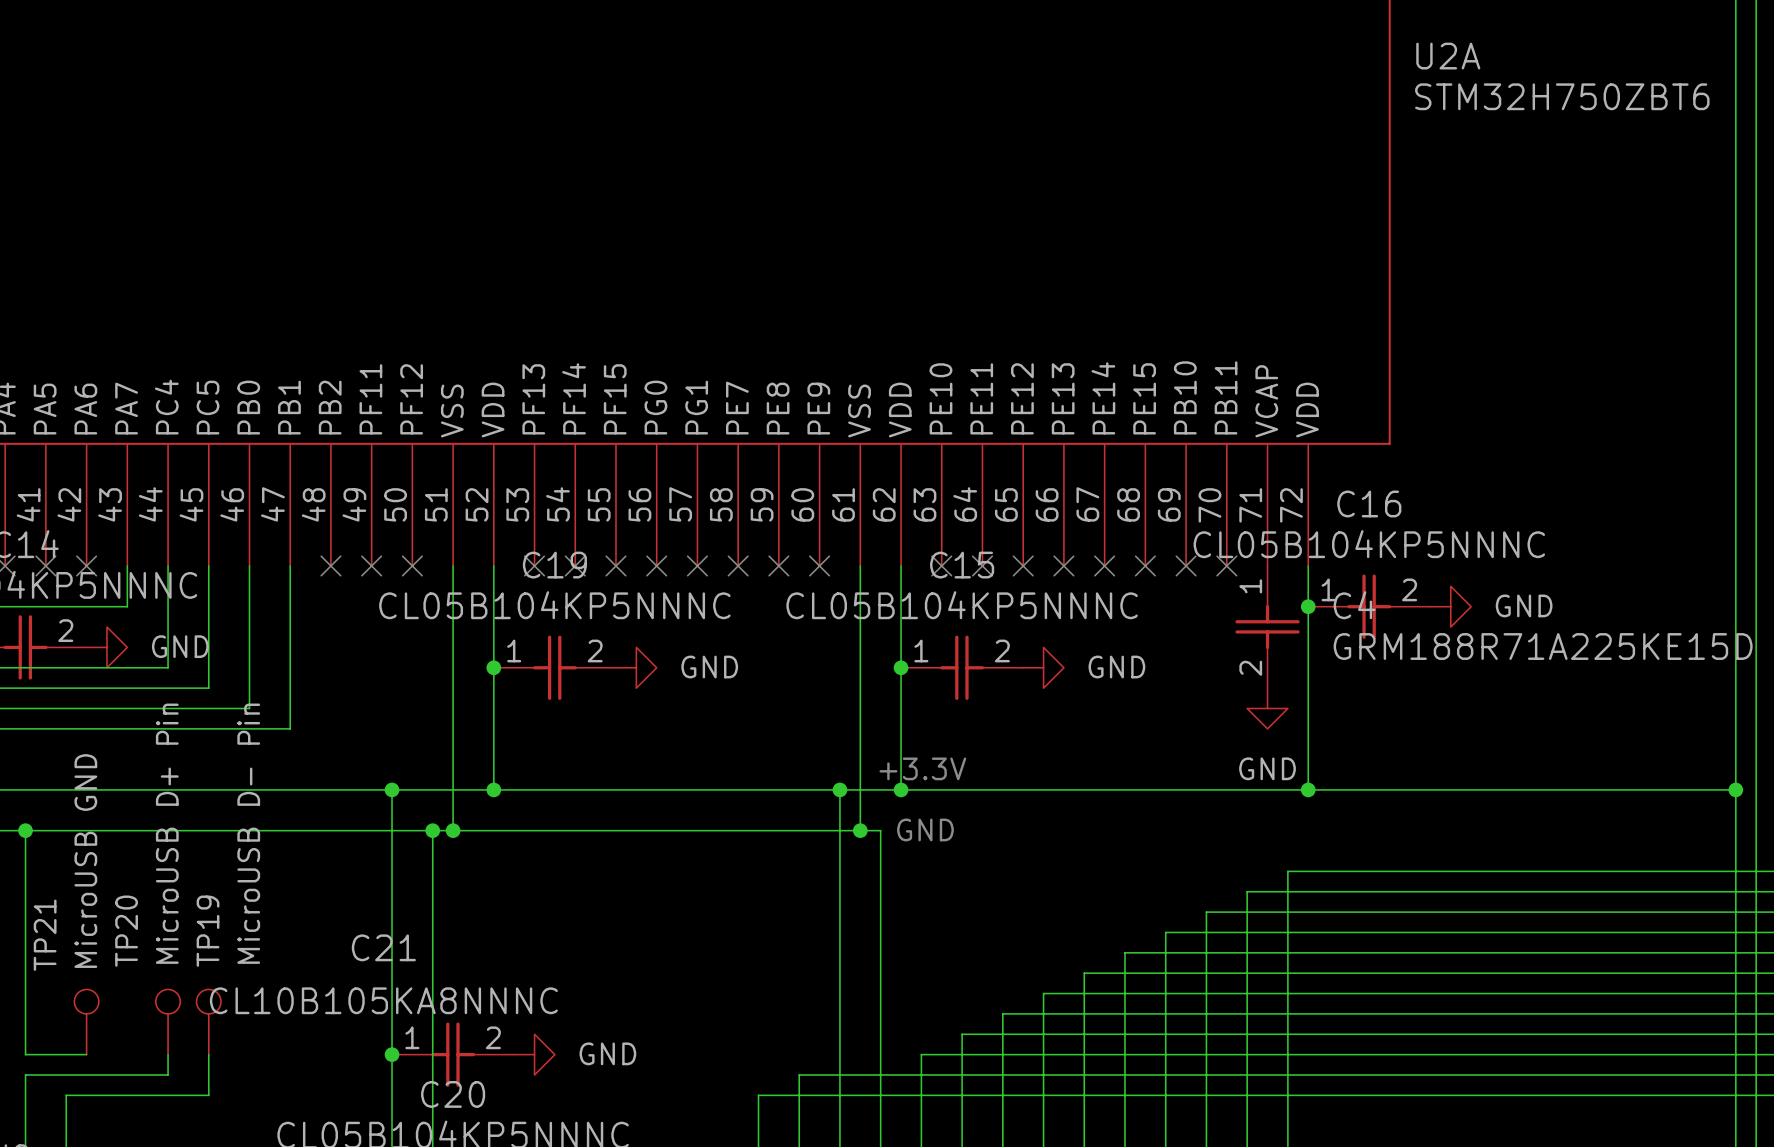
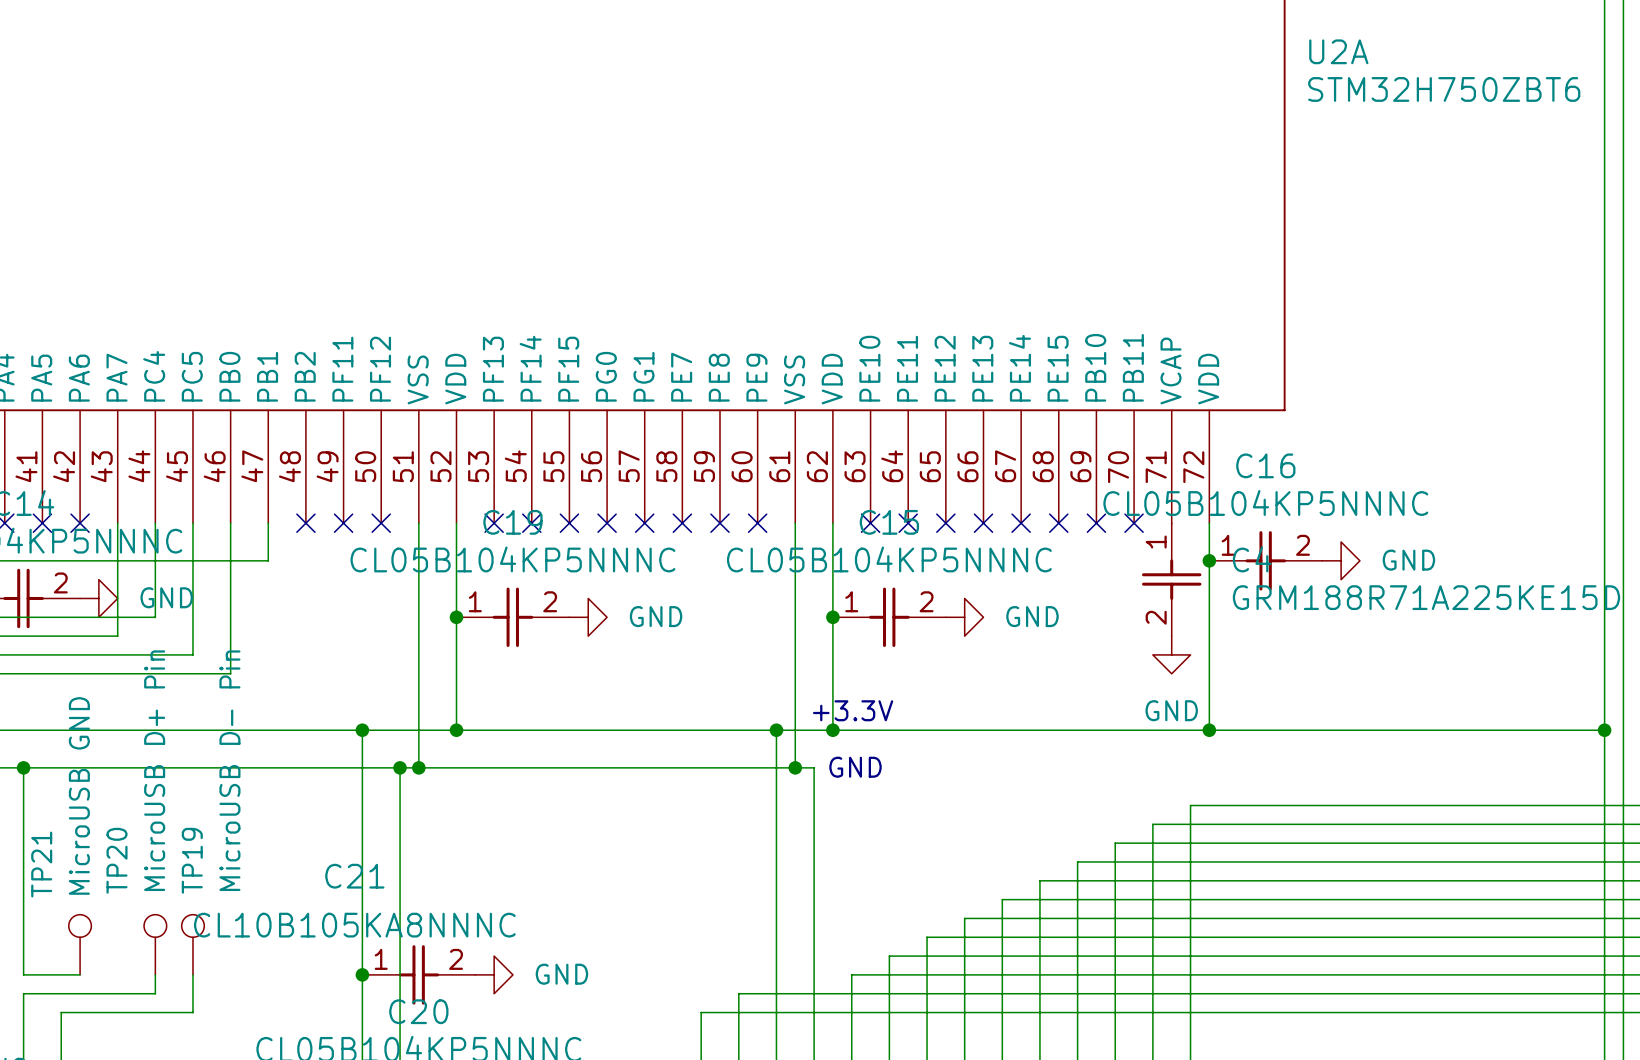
wire: (290, 606) (290, 728) (249, 728) -> (268, 560) (117, 560) (117, 636)
wire: (127, 688) (208, 688) -> (192, 654) (192, 636)
wire: (208, 708) (249, 708) -> (230, 673) (230, 654)

